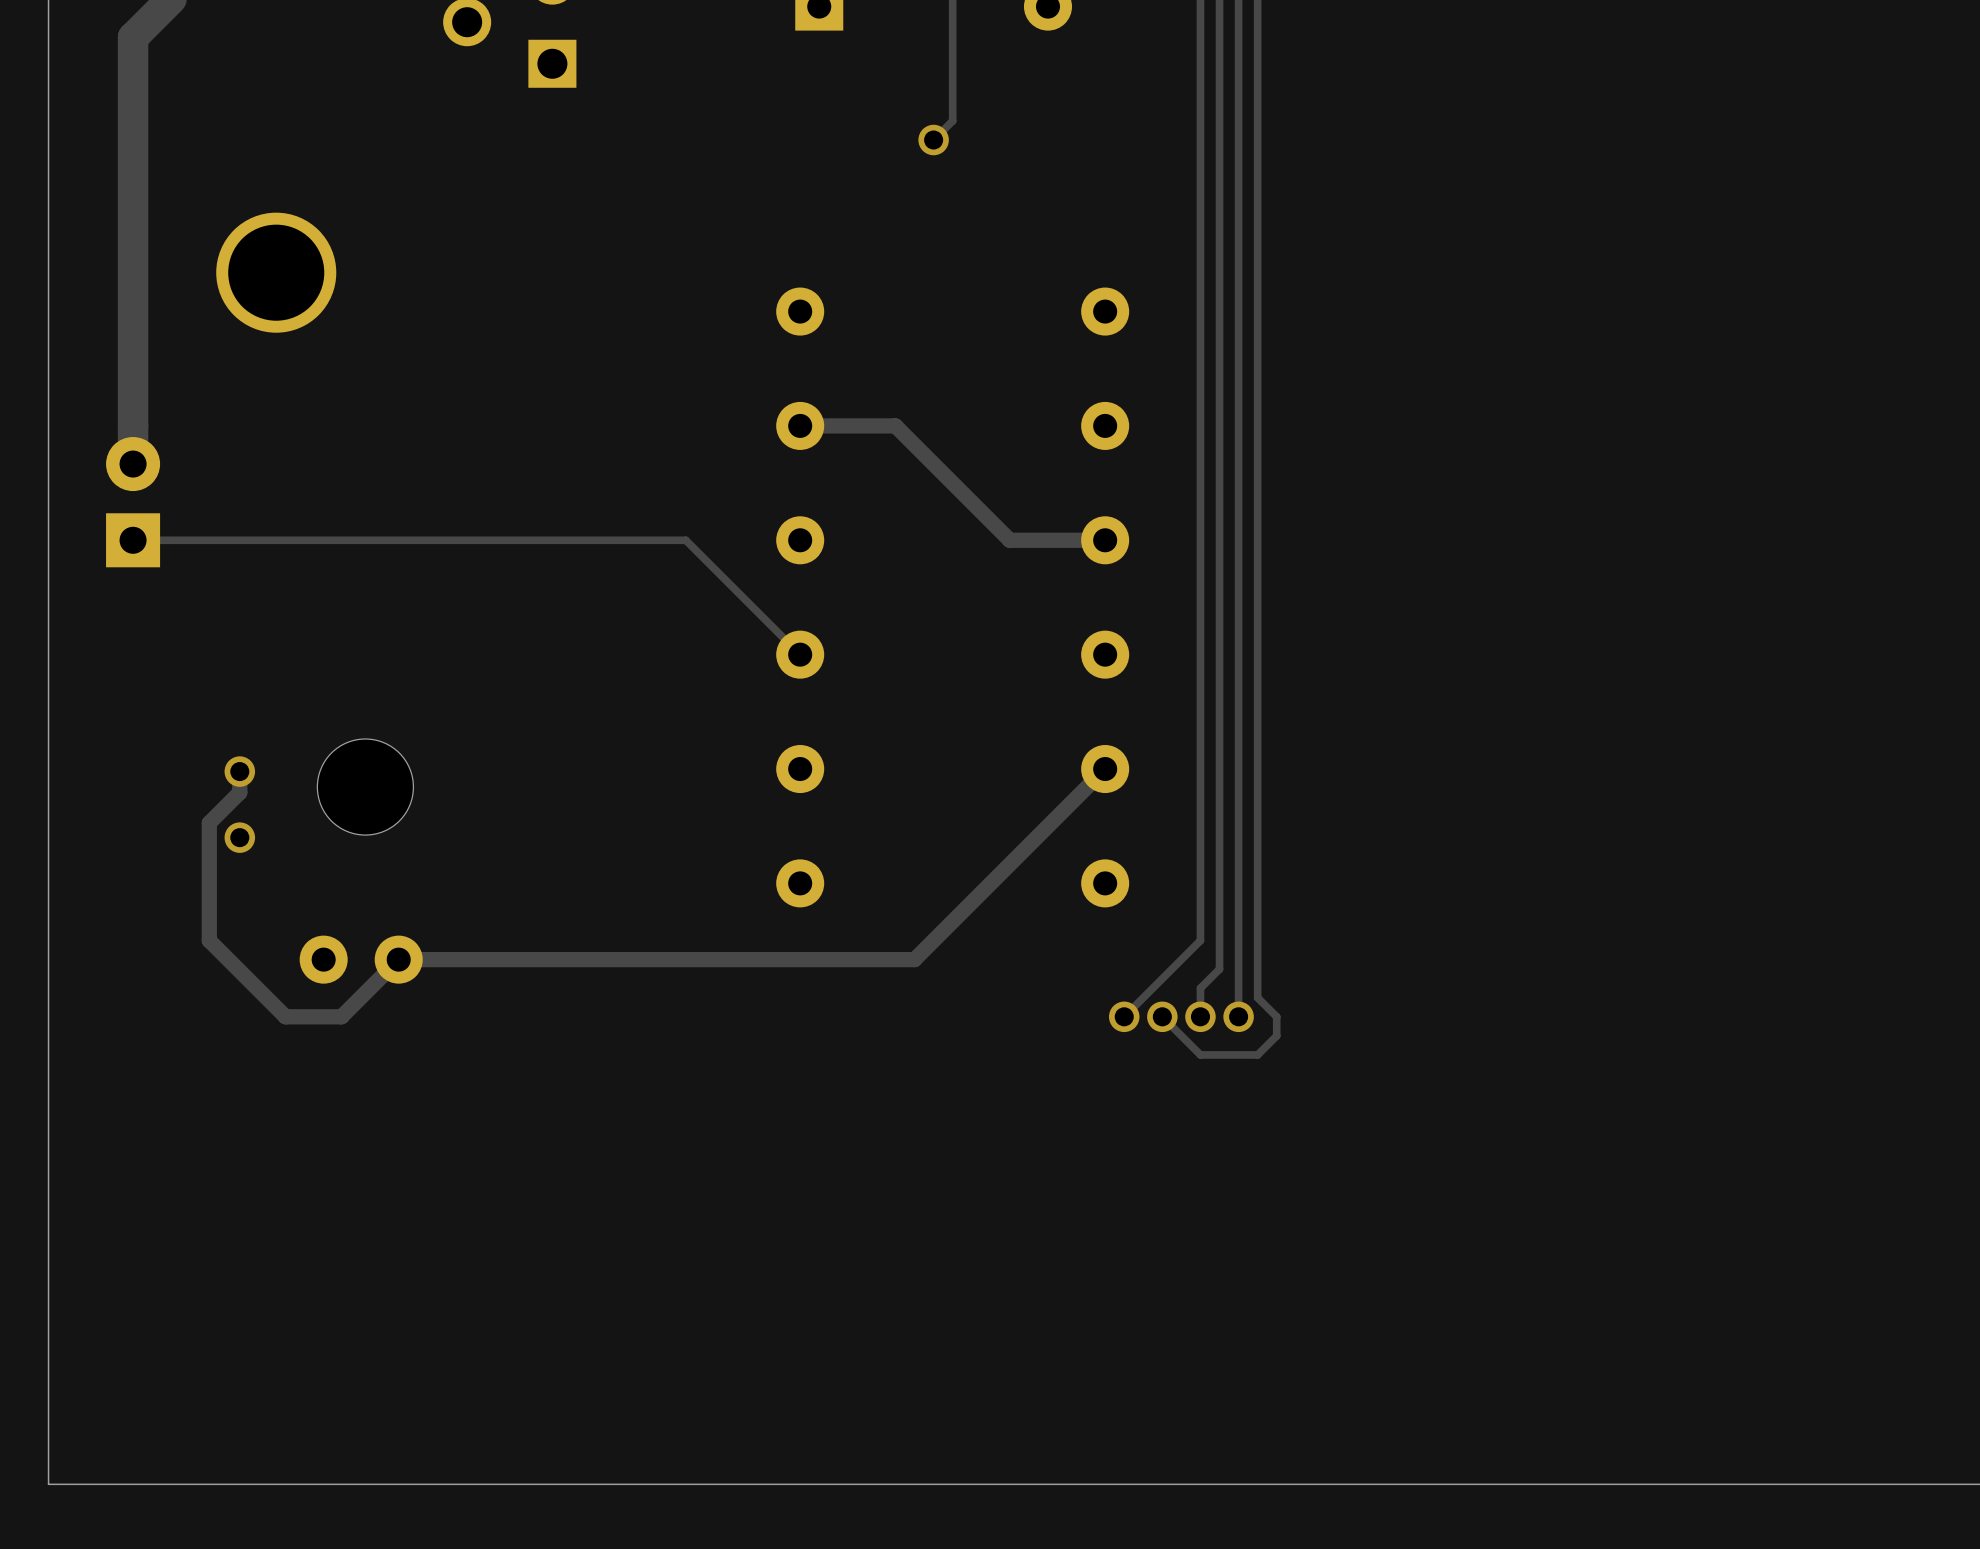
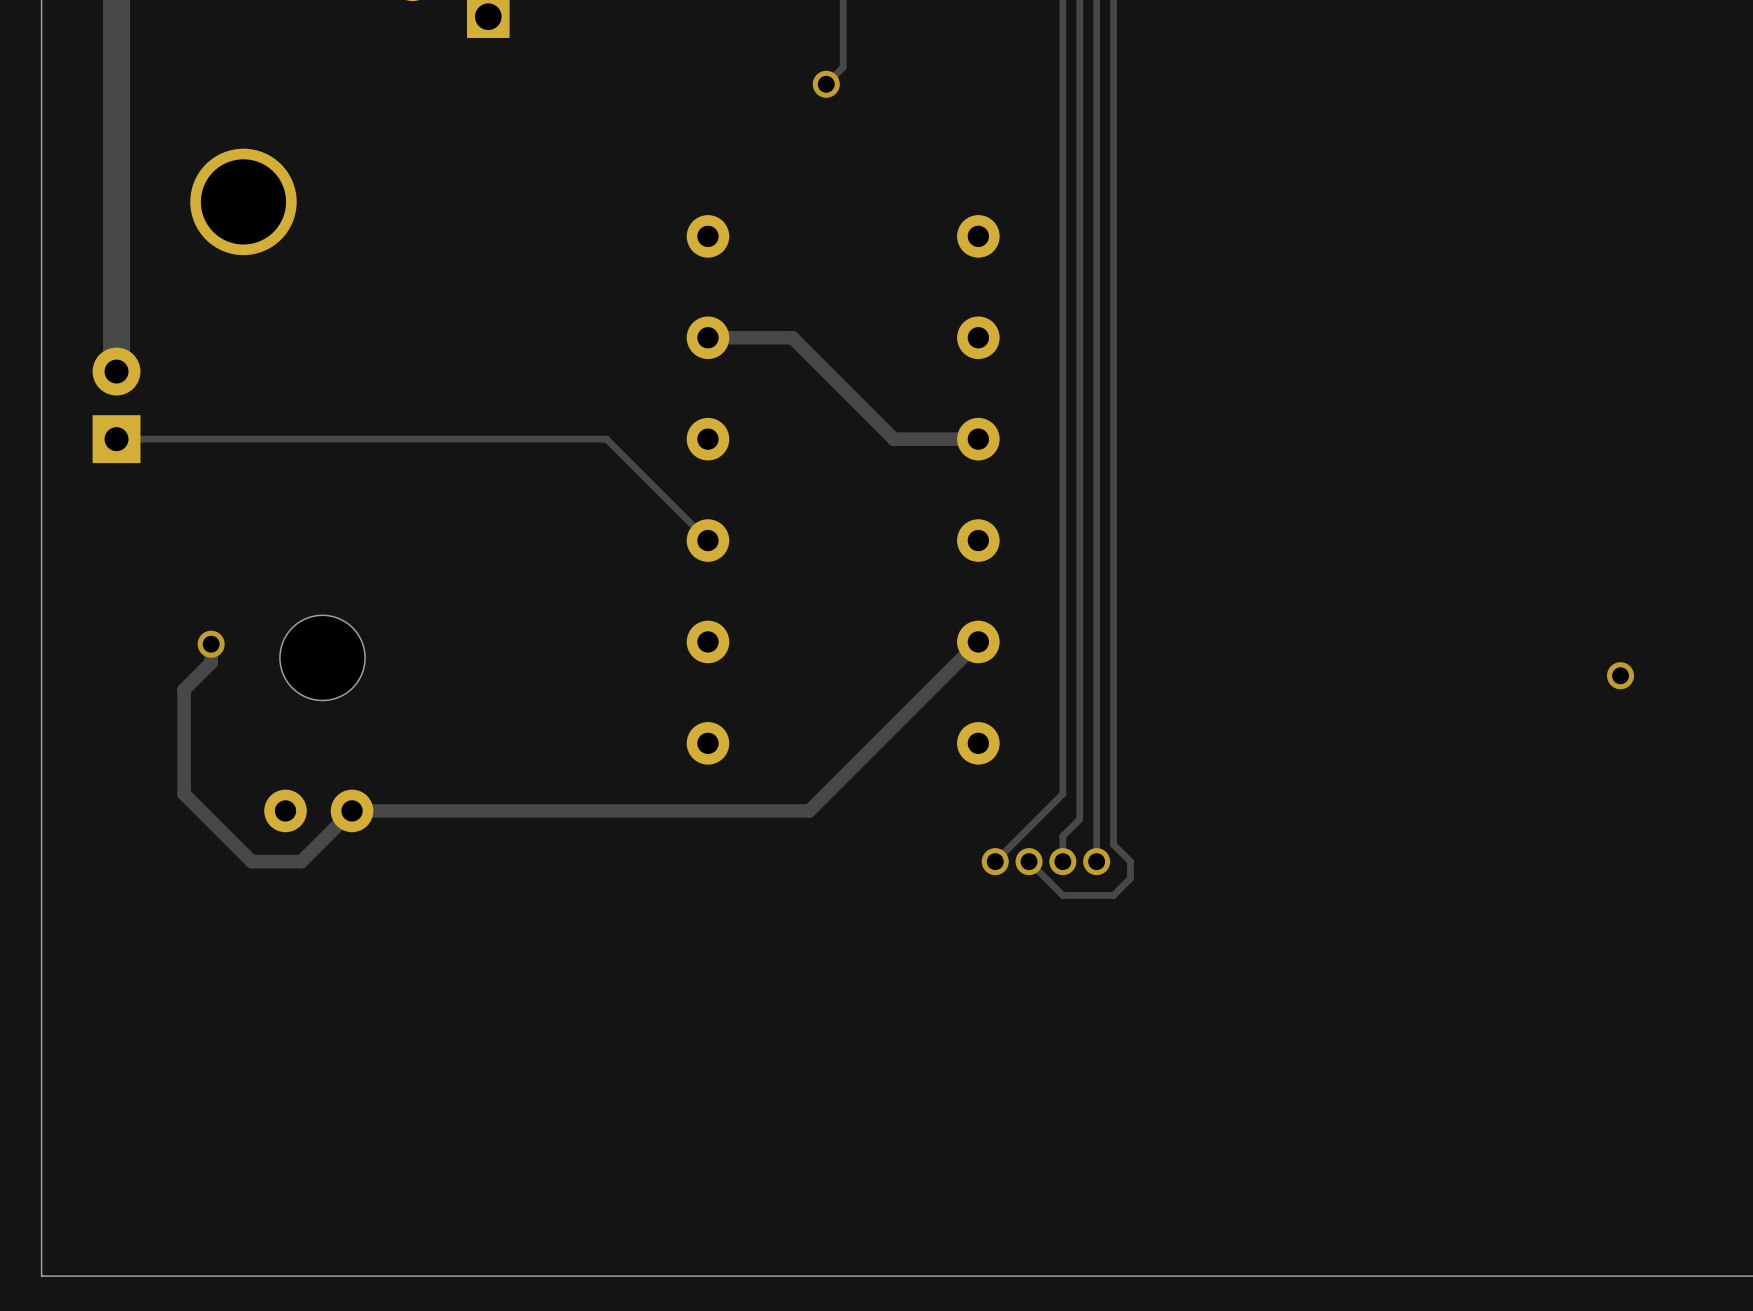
via: none -> (1620, 675)
via: (239, 837) -> none

